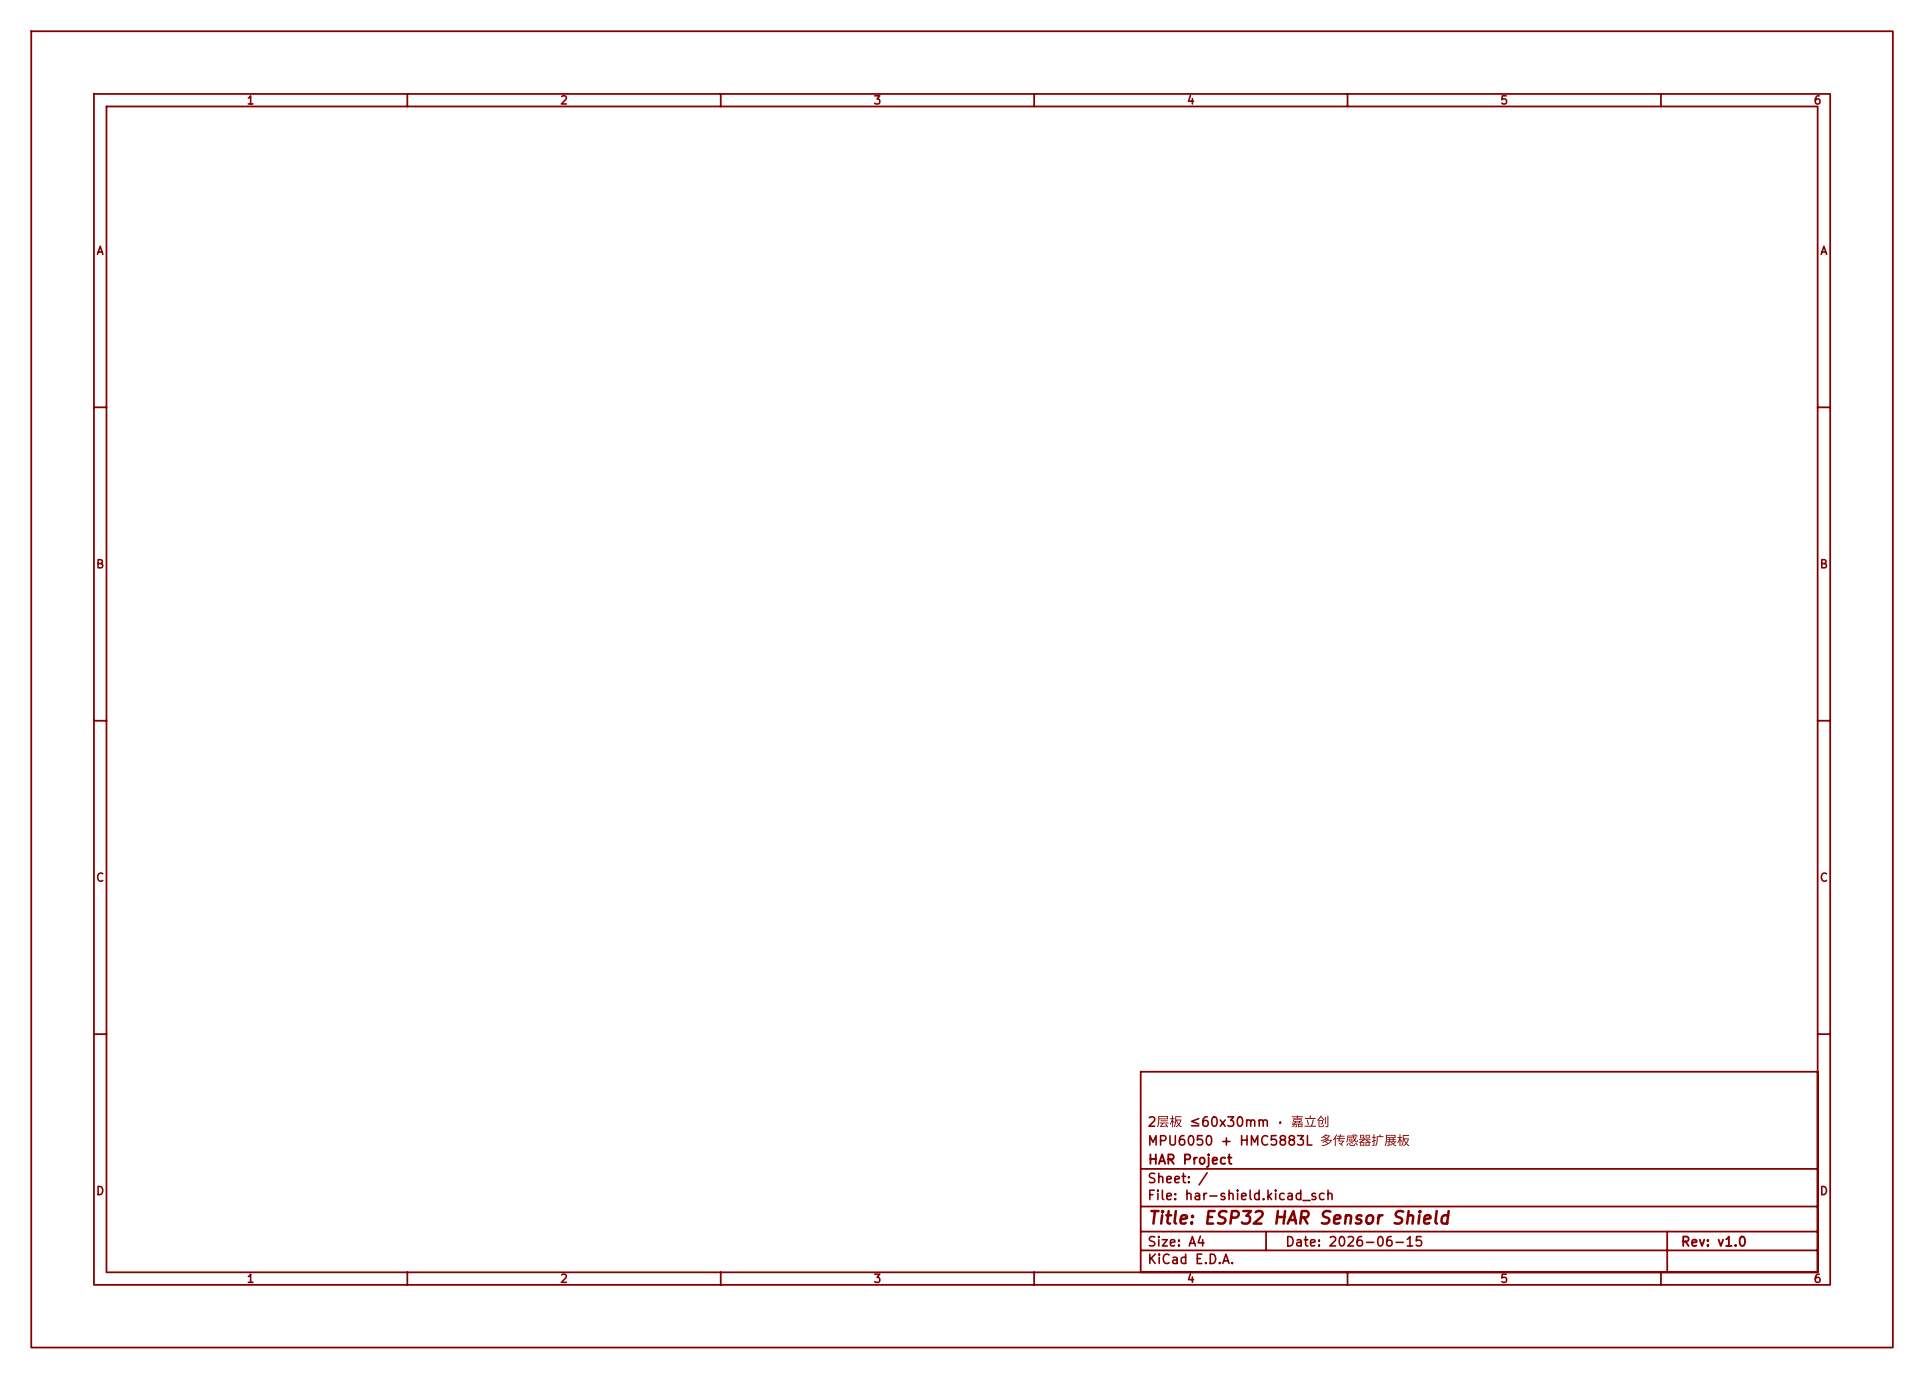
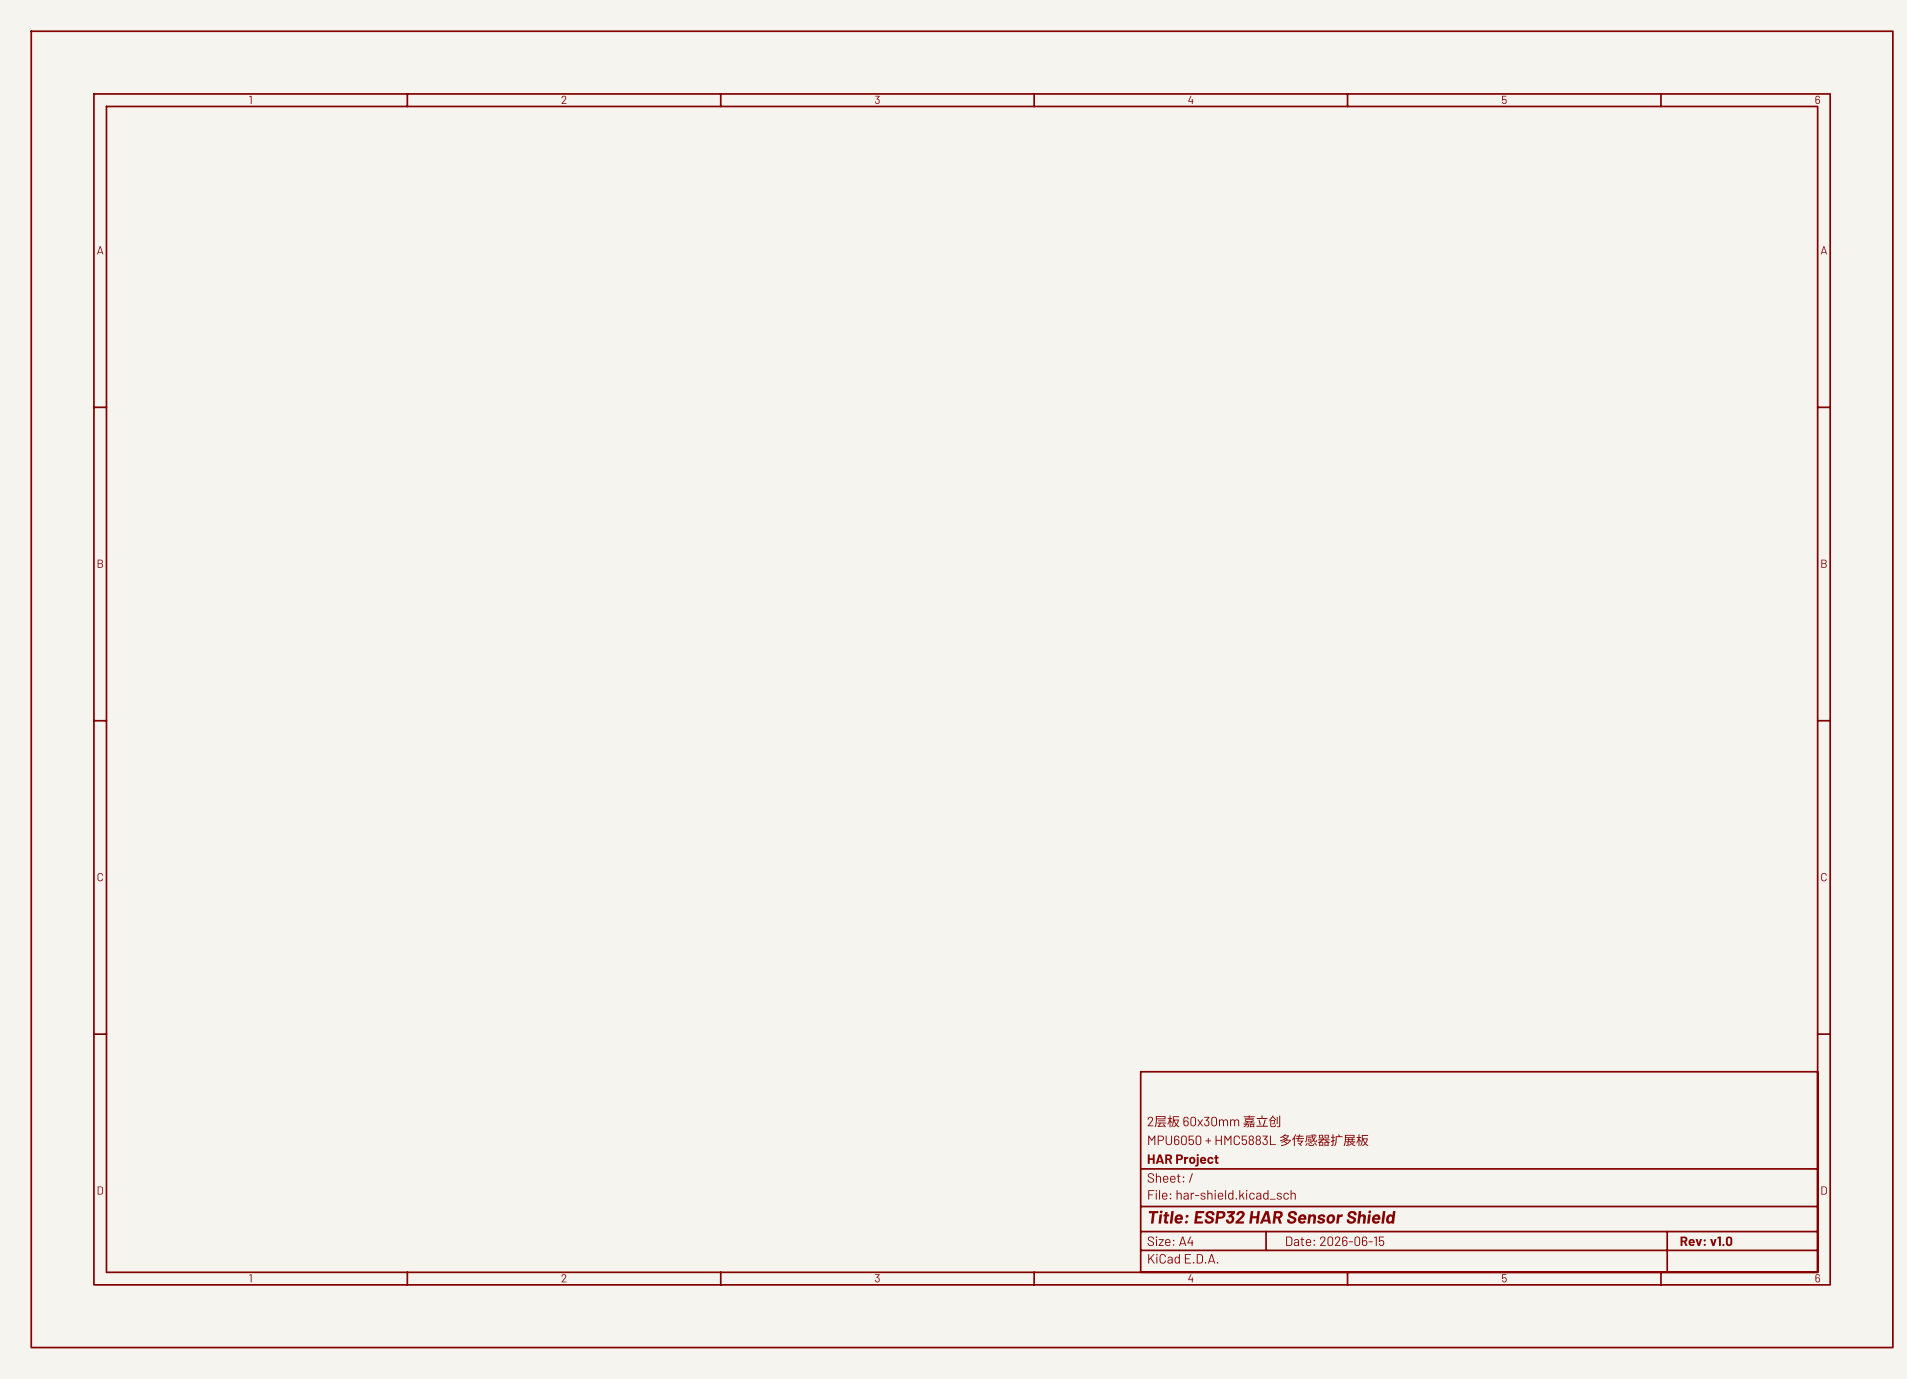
title block: 2层板 ≤60x30mm · 嘉立创 (1238, 1121) -> 2层板 60x30mm 嘉立创 (1213, 1121)

